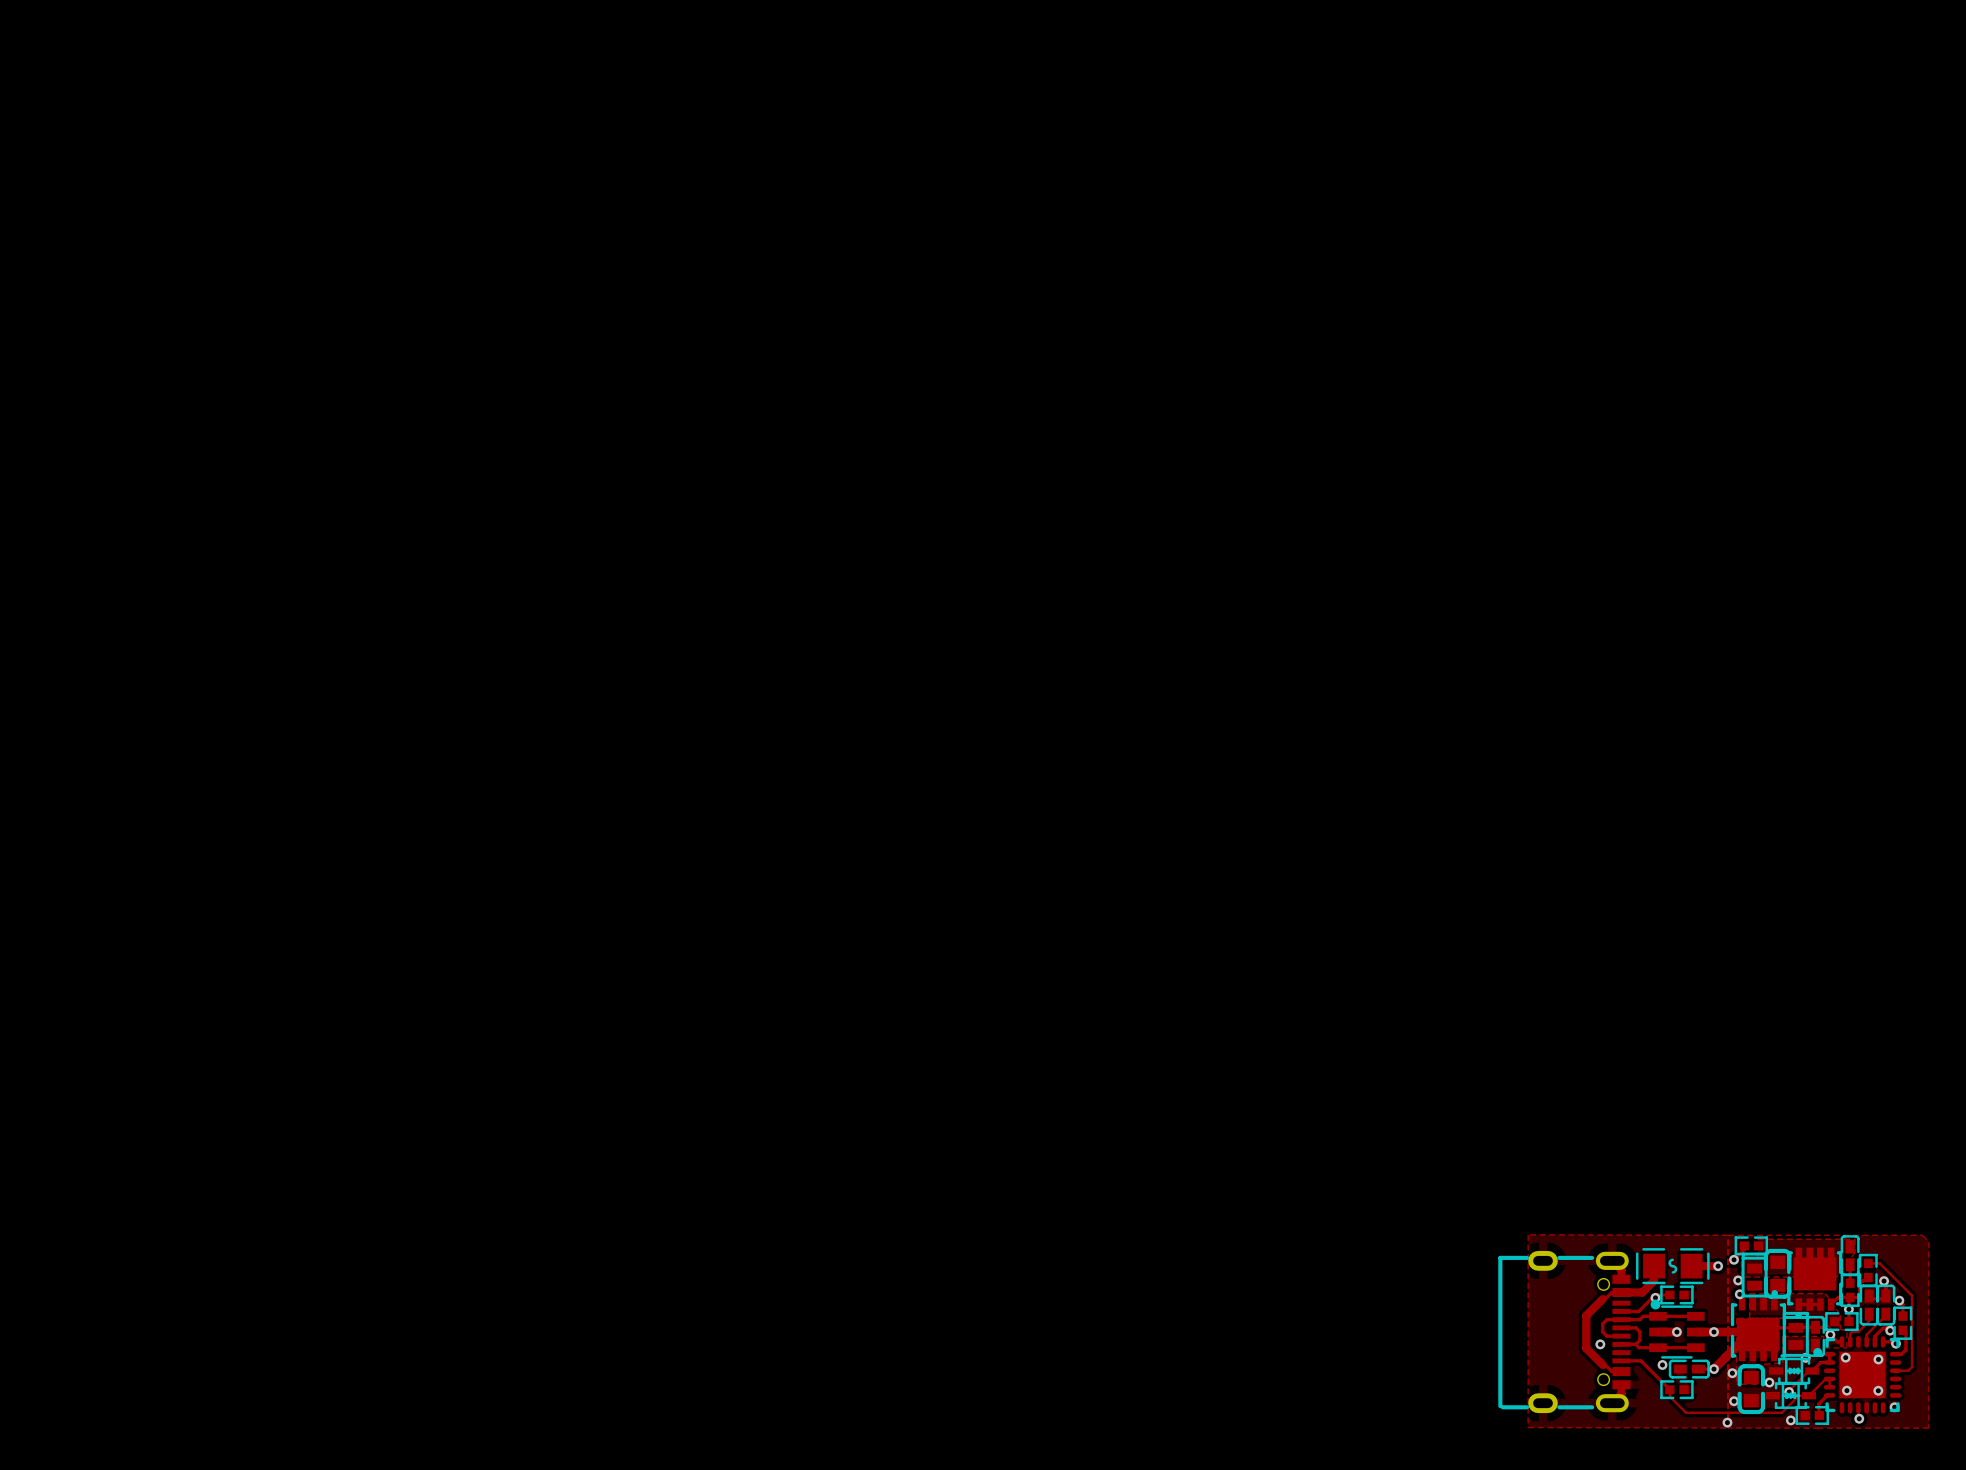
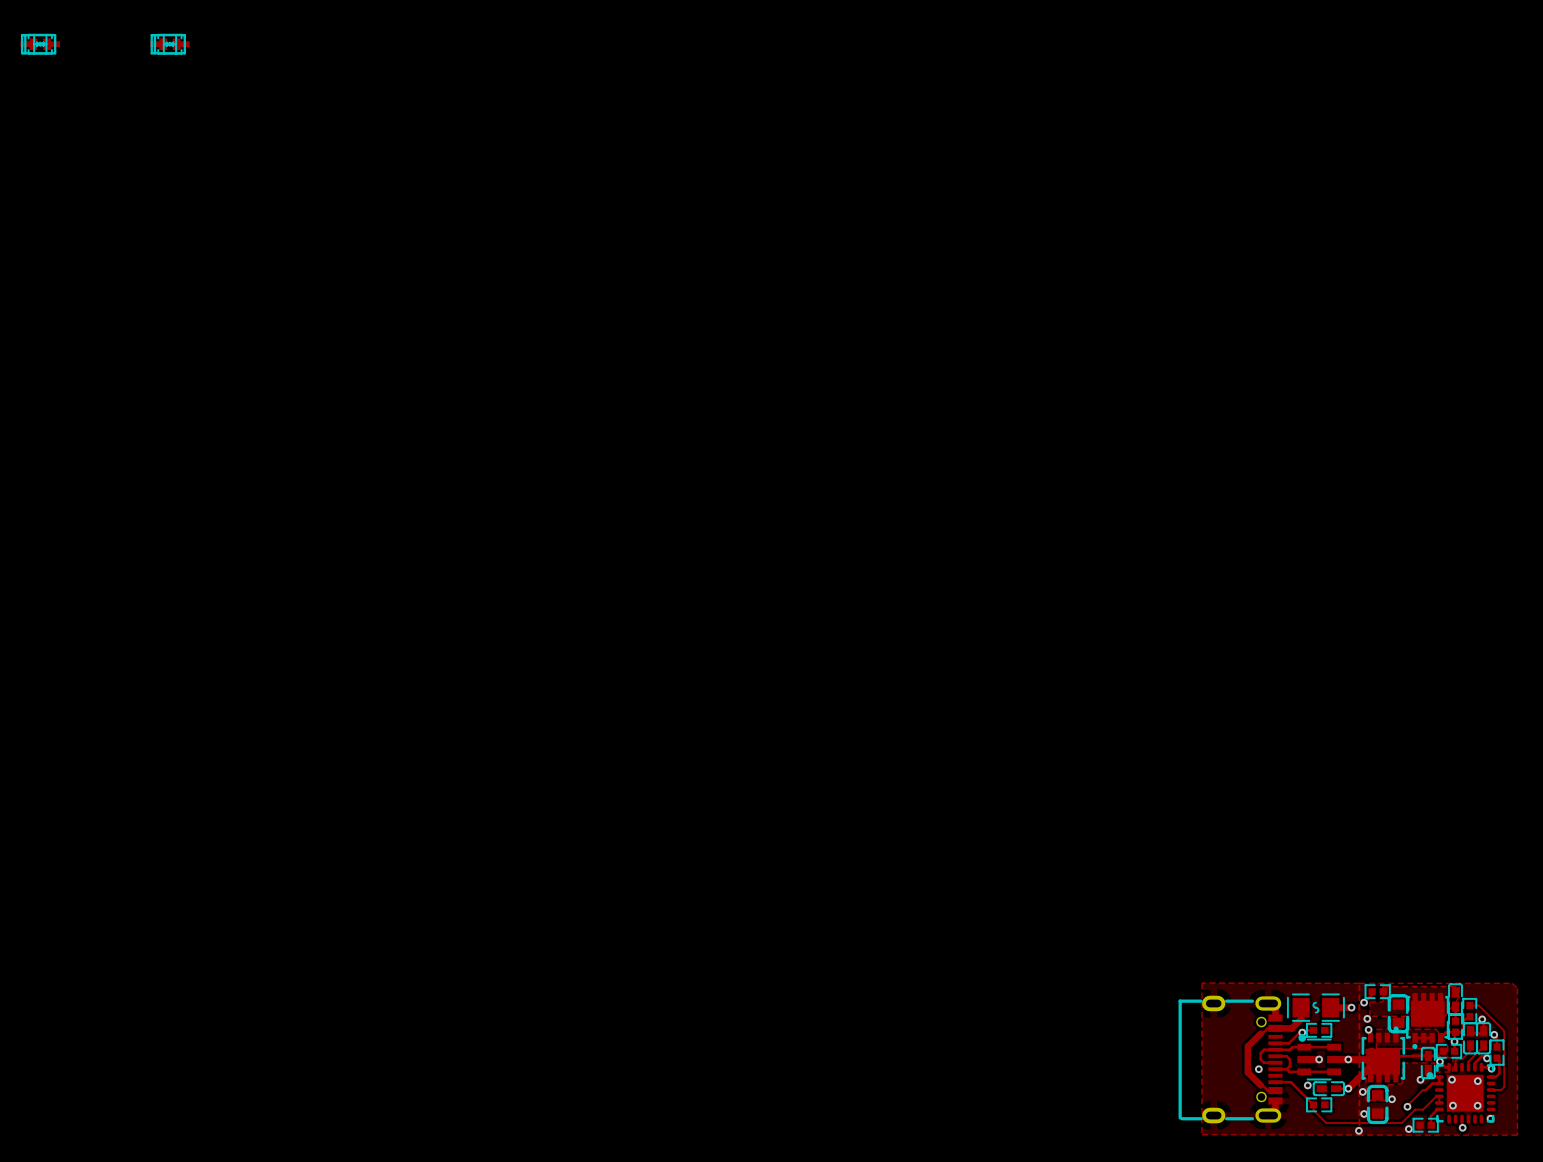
part: none -> (38, 44)
part: none -> (40, 44)
part: none -> (168, 44)
part: none -> (169, 44)
part: (1754, 1275) -> none
part: (1795, 1334) -> none
part: (1794, 1371) -> none
part: (1790, 1395) -> none

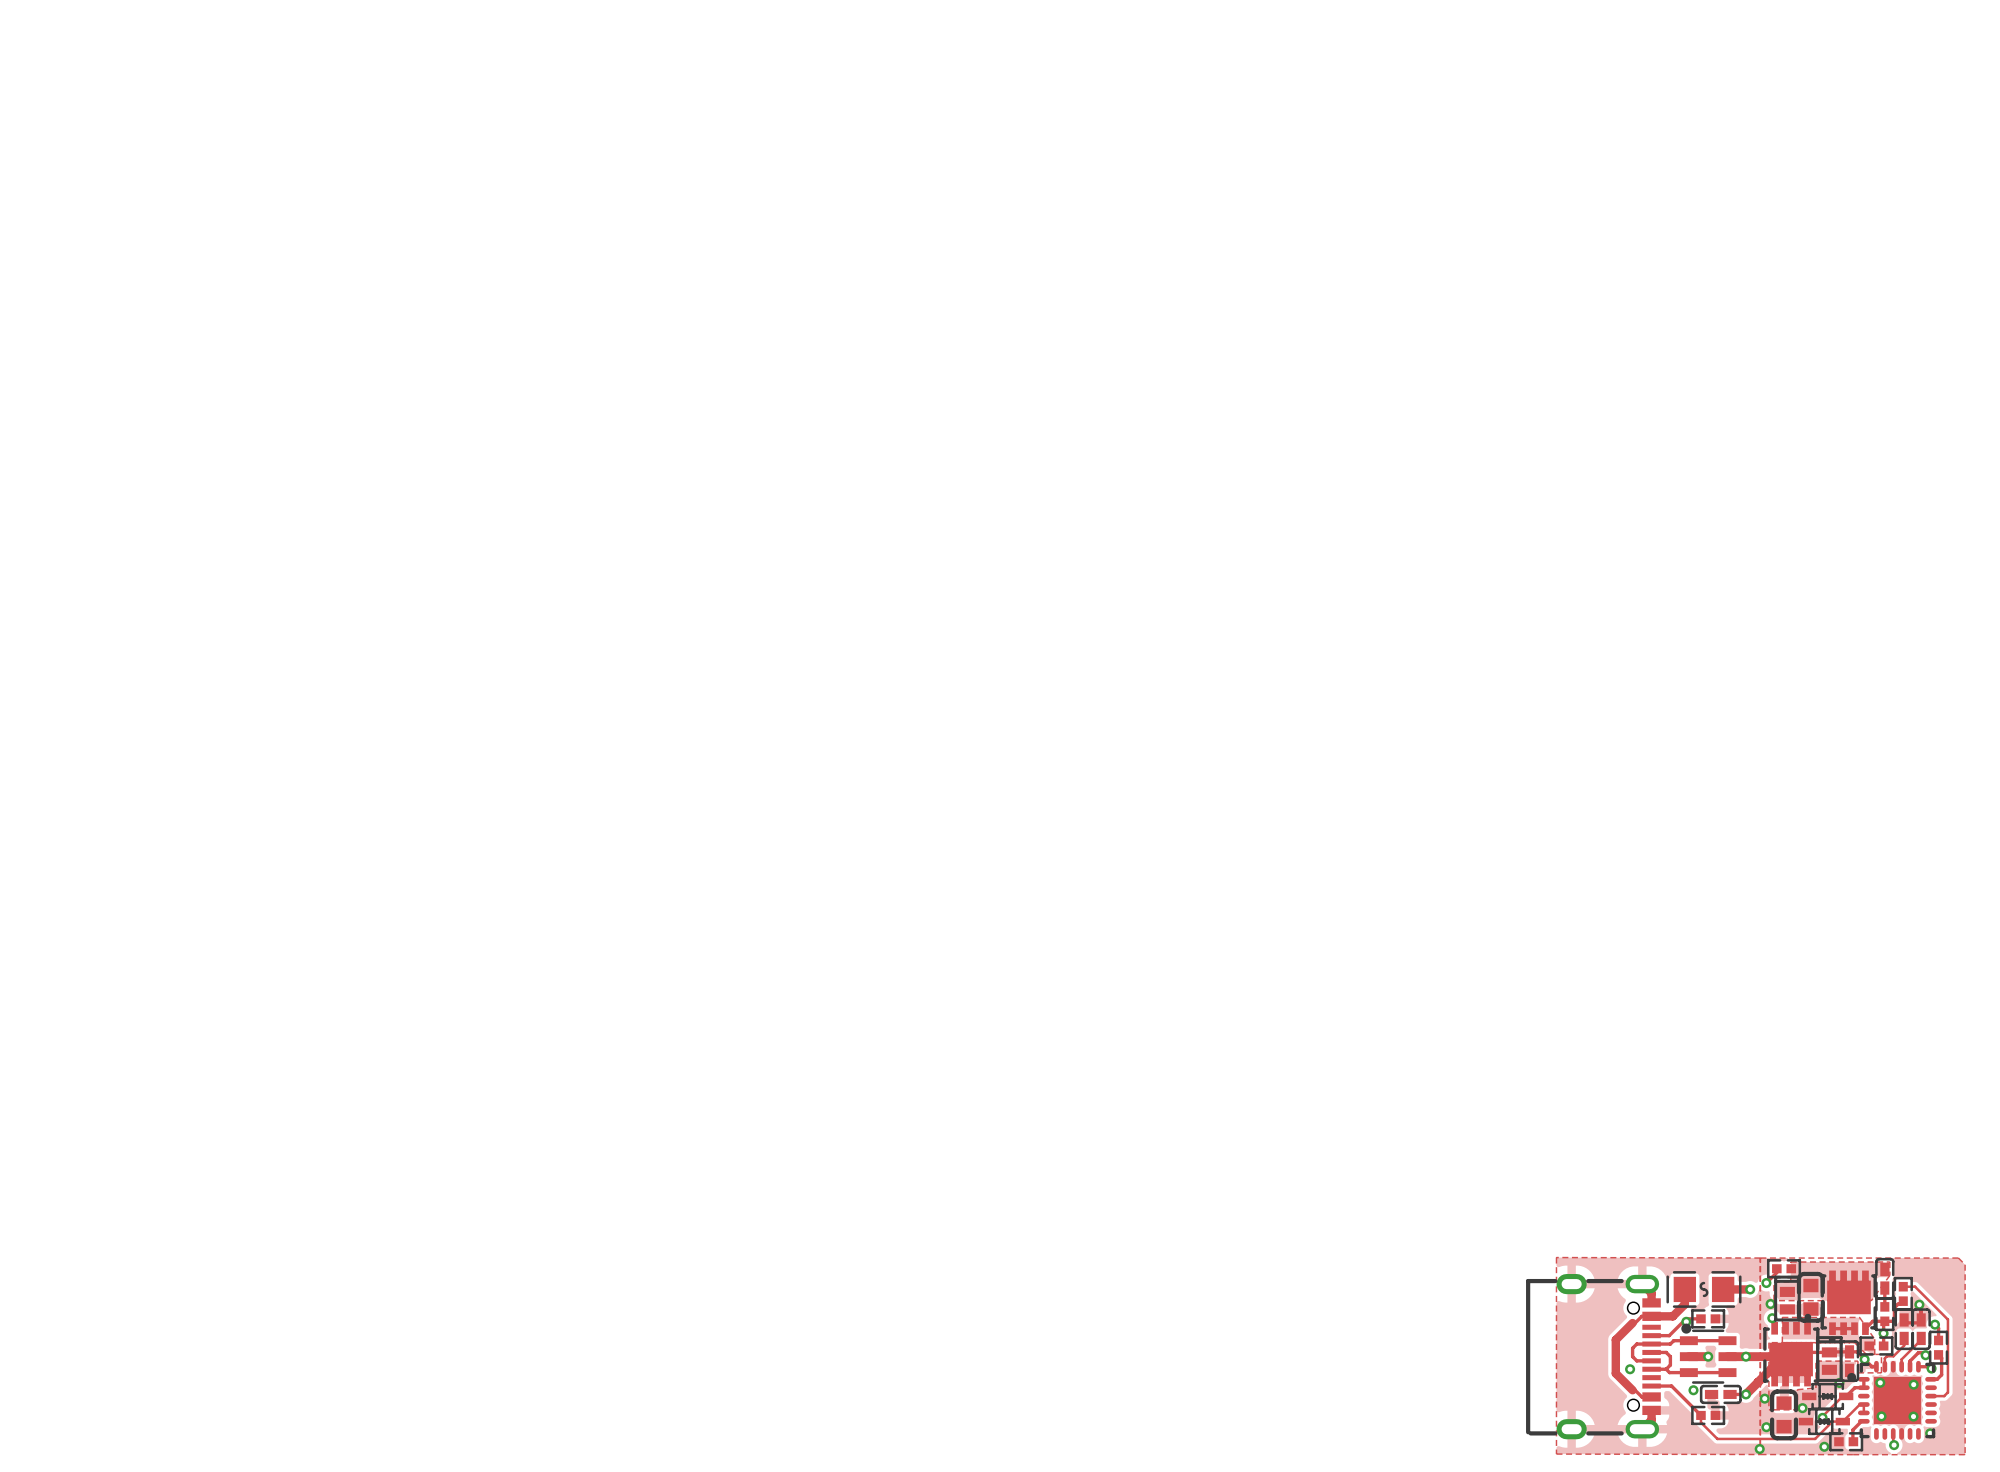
part: (38, 44) -> none
part: (40, 44) -> none
part: (168, 44) -> none
part: (169, 44) -> none
part: none -> (1787, 1298)
part: none -> (1829, 1359)
part: none -> (1827, 1396)
part: none -> (1824, 1421)

